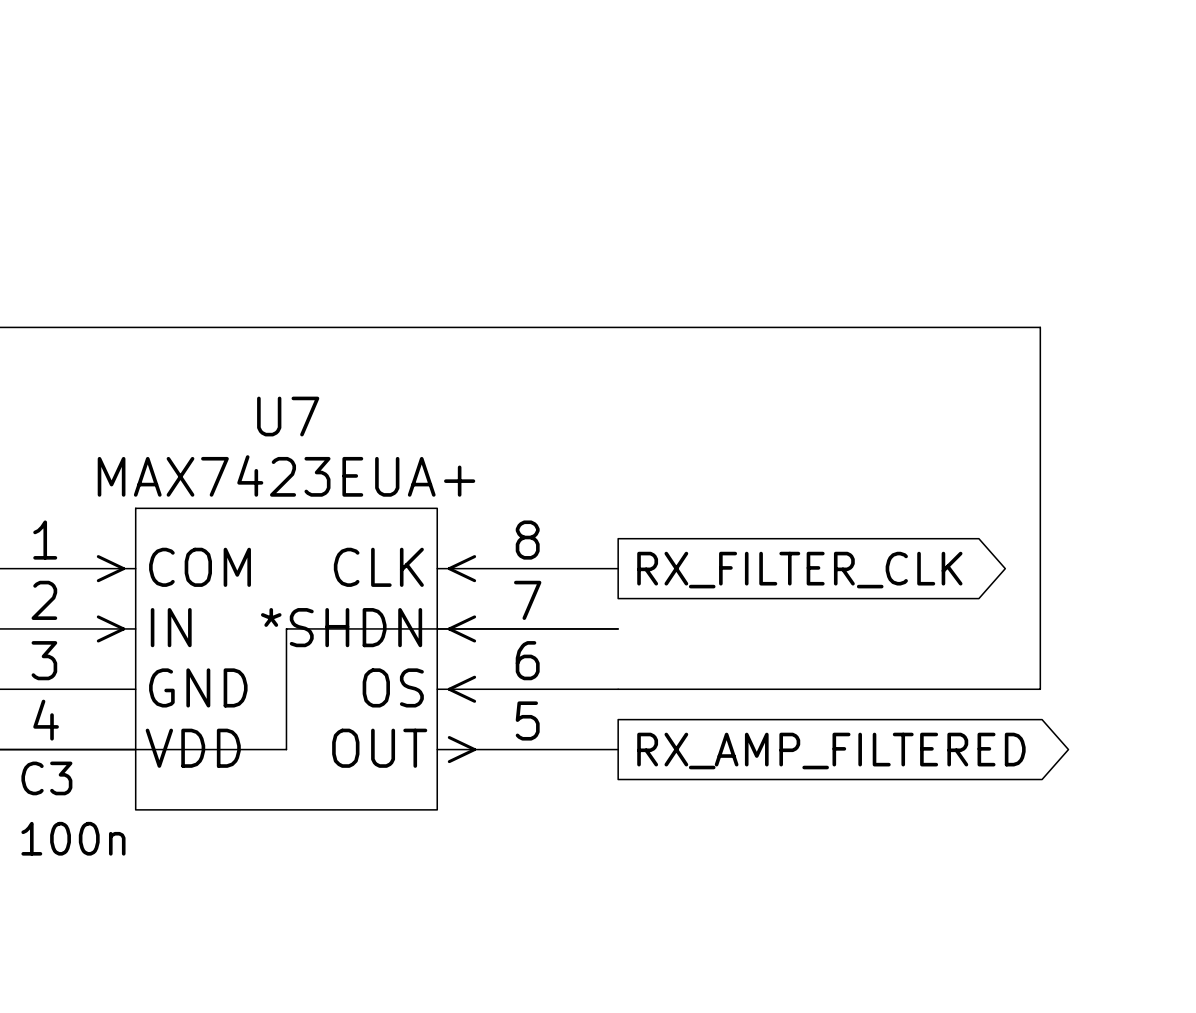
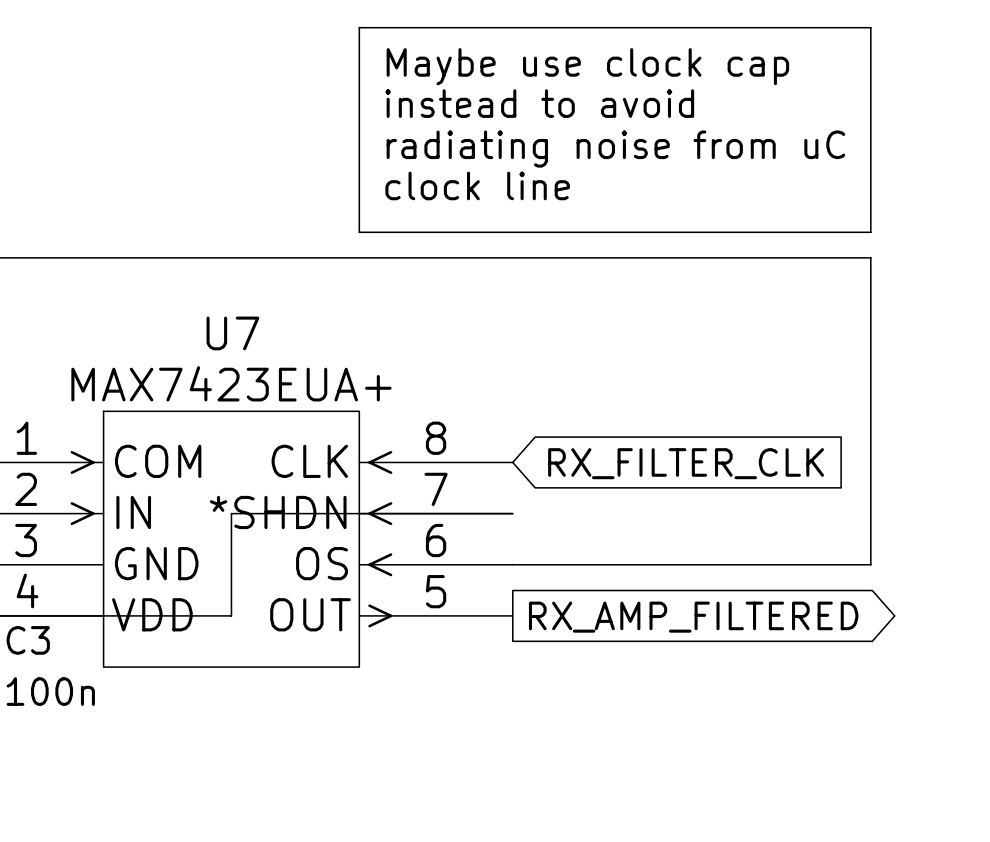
line: none -> (359, 27) (870, 27) (870, 232) (359, 232) (359, 27)
text: none -> Maybe use clock cap (587, 66)
text: none -> instead to avoid (539, 103)
text: none -> radiating noise from uC (615, 149)
text: none -> clock line (477, 185)
global label shape: output (799, 570) -> input (686, 463)

